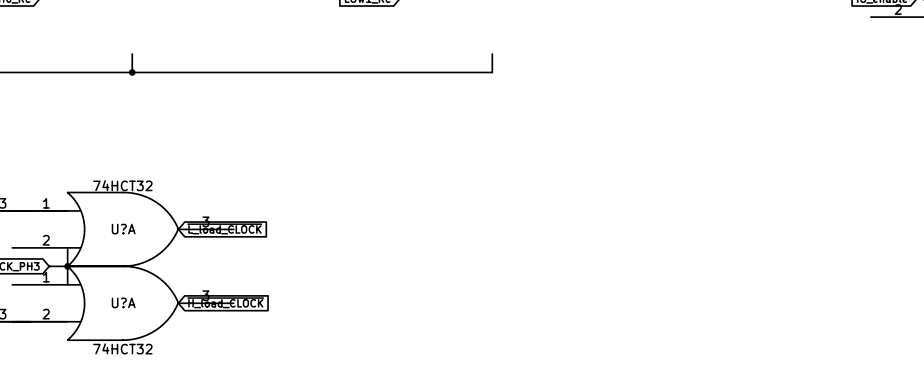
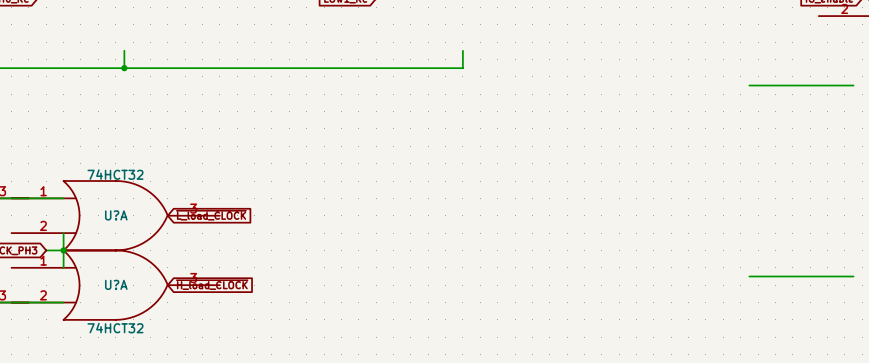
wire: none -> (749, 85) (853, 85)
wire: none -> (749, 276) (853, 276)

